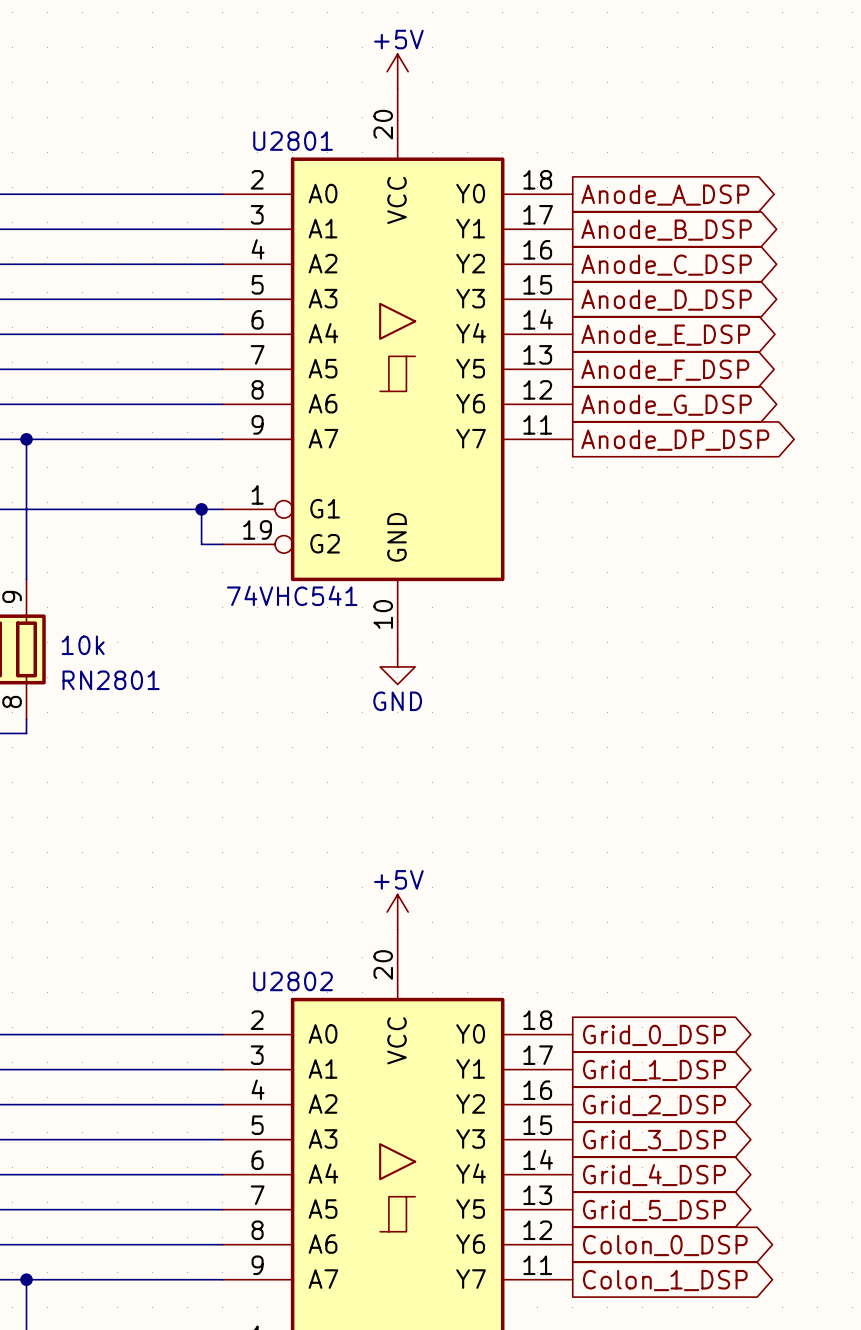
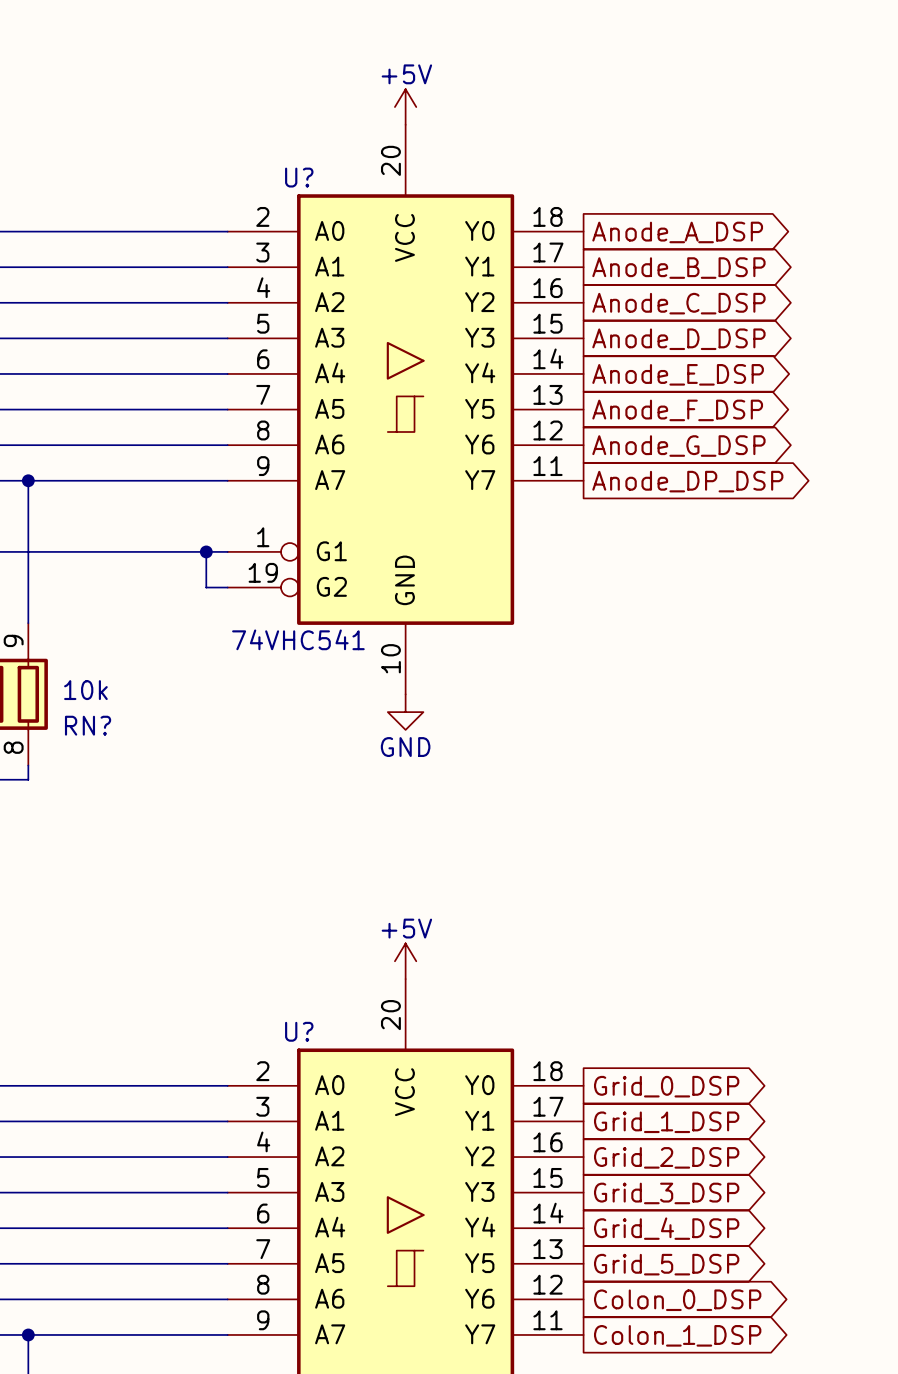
U2801 name: U2801 (293, 141) -> U? (299, 177)
RN2801 name: RN2801 (111, 680) -> RN? (88, 725)
U2802 name: U2802 (293, 981) -> U? (299, 1031)

